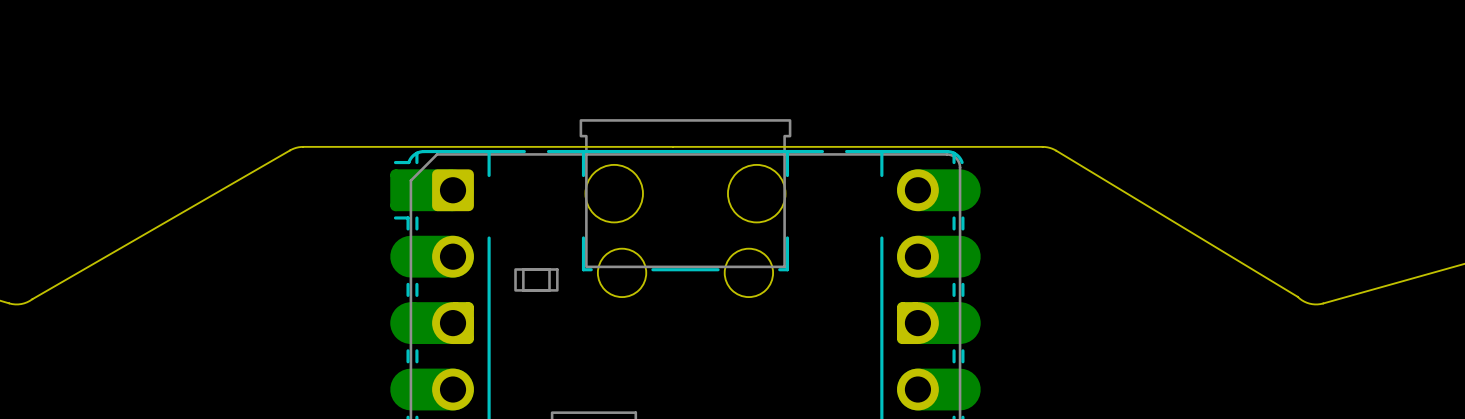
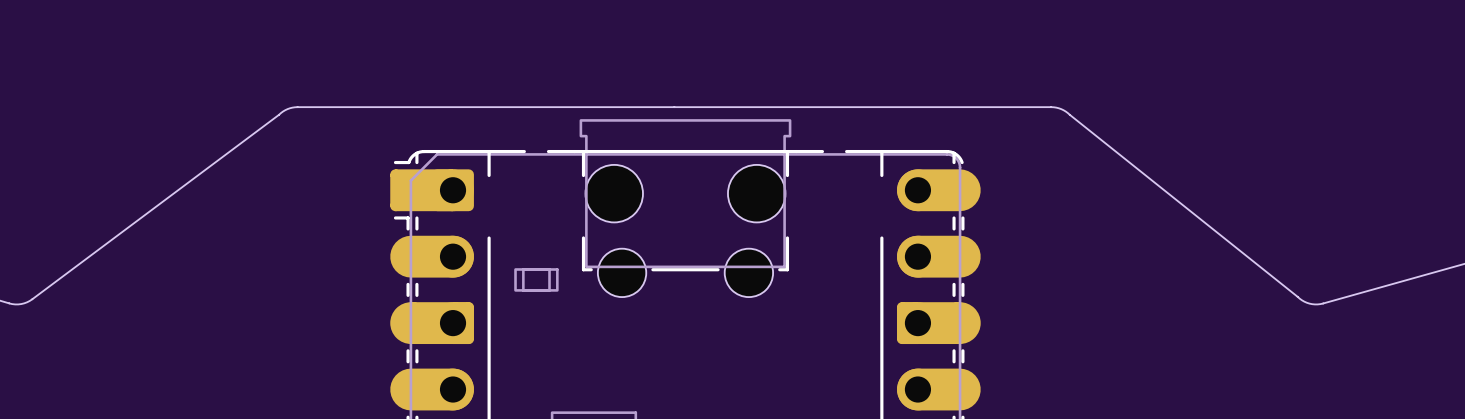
board edge: (1297, 296) (1056, 150) (1047, 147) (303, 146) (290, 150) (32, 299) -> (1297, 296) (1067, 113) (1056, 107) (297, 107) (282, 111) (32, 299)

